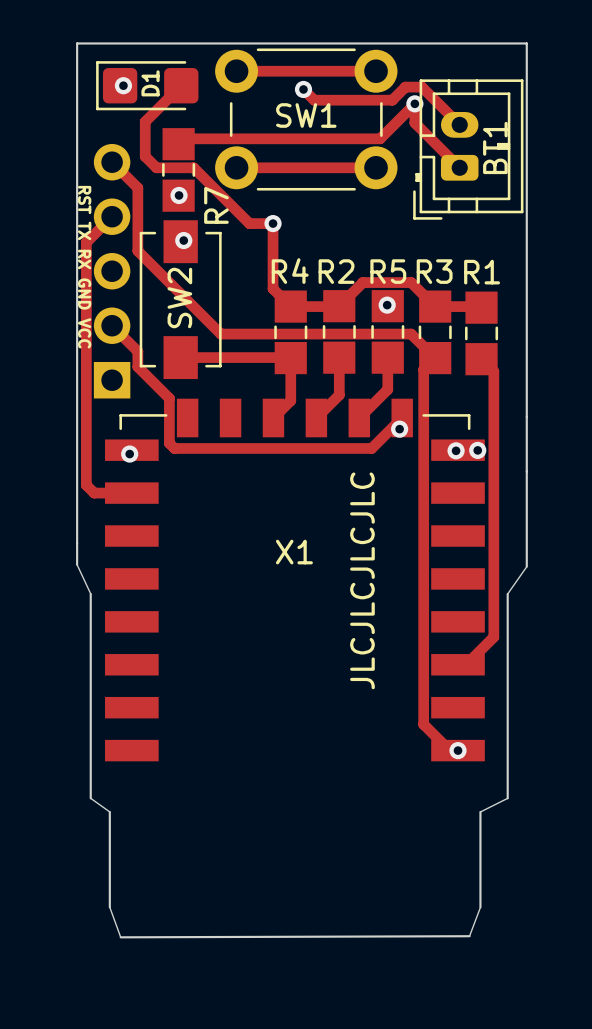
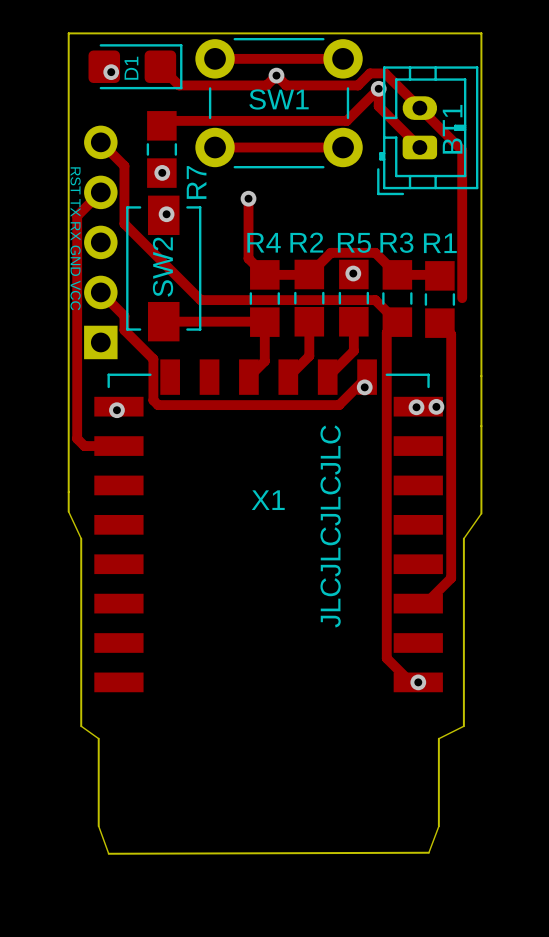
track: none -> (160, 66) (179, 85) (266, 85) (276, 75)
D1 rotation: 0° (147, 85) -> 180° (135, 66)
track: (181, 85) (145, 121) (145, 156) (156, 167) (193, 167) (249, 223) (273, 223) -> none
track: none -> (419, 108) (462, 150) (462, 298)

